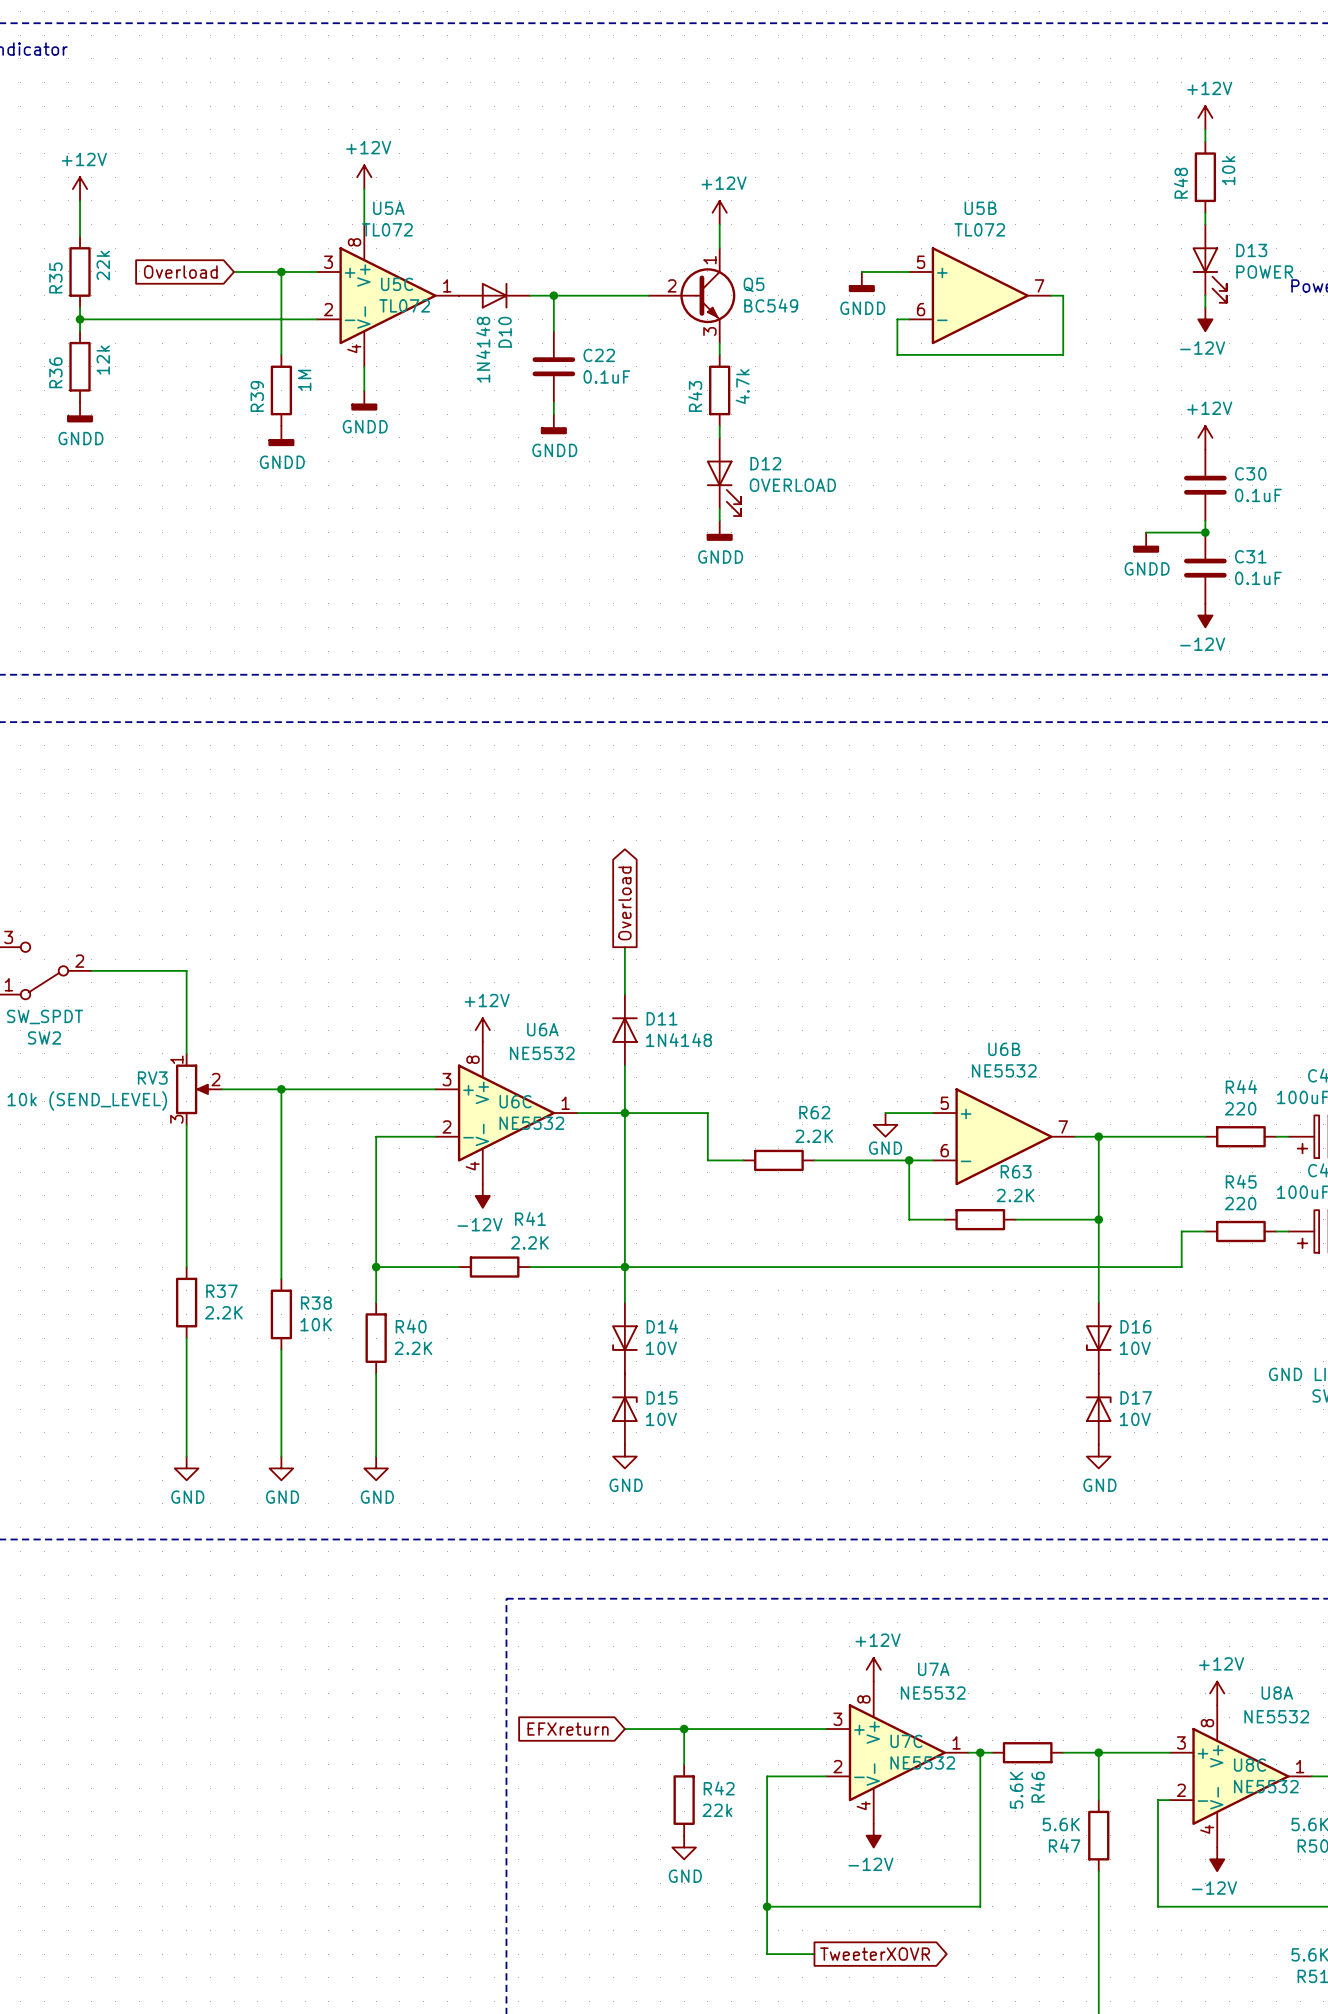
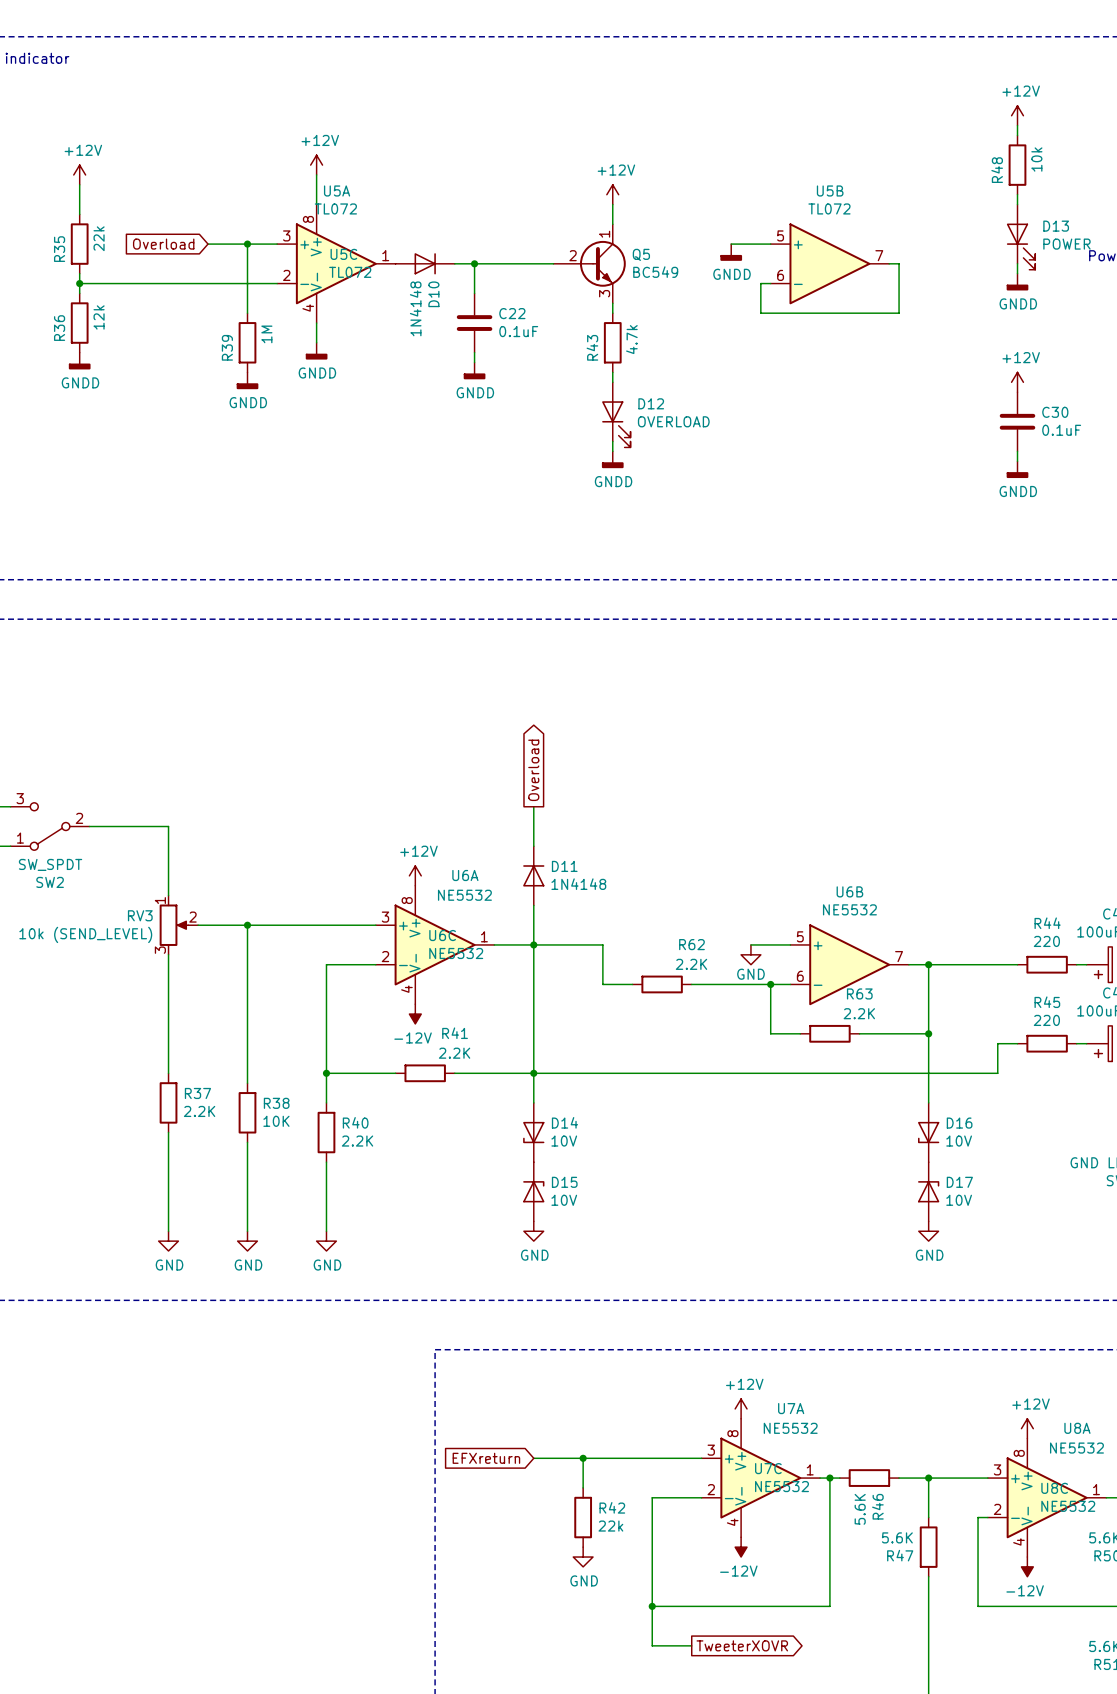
power symbol: -12V (1205, 319) -> GNDD (1017, 282)
wire: (1146, 532) (1205, 532) -> none
junction: (1205, 532) -> none
power symbol position: GNDD (1146, 542) -> GNDD (1017, 469)
C31: 0.1uF (1205, 568) -> none
power symbol: -12V (1205, 615) -> none

